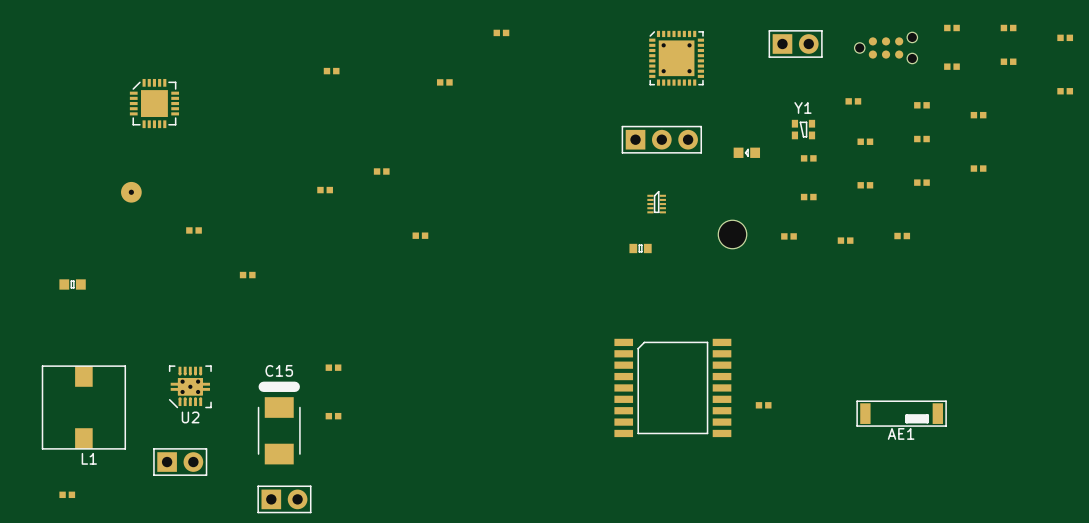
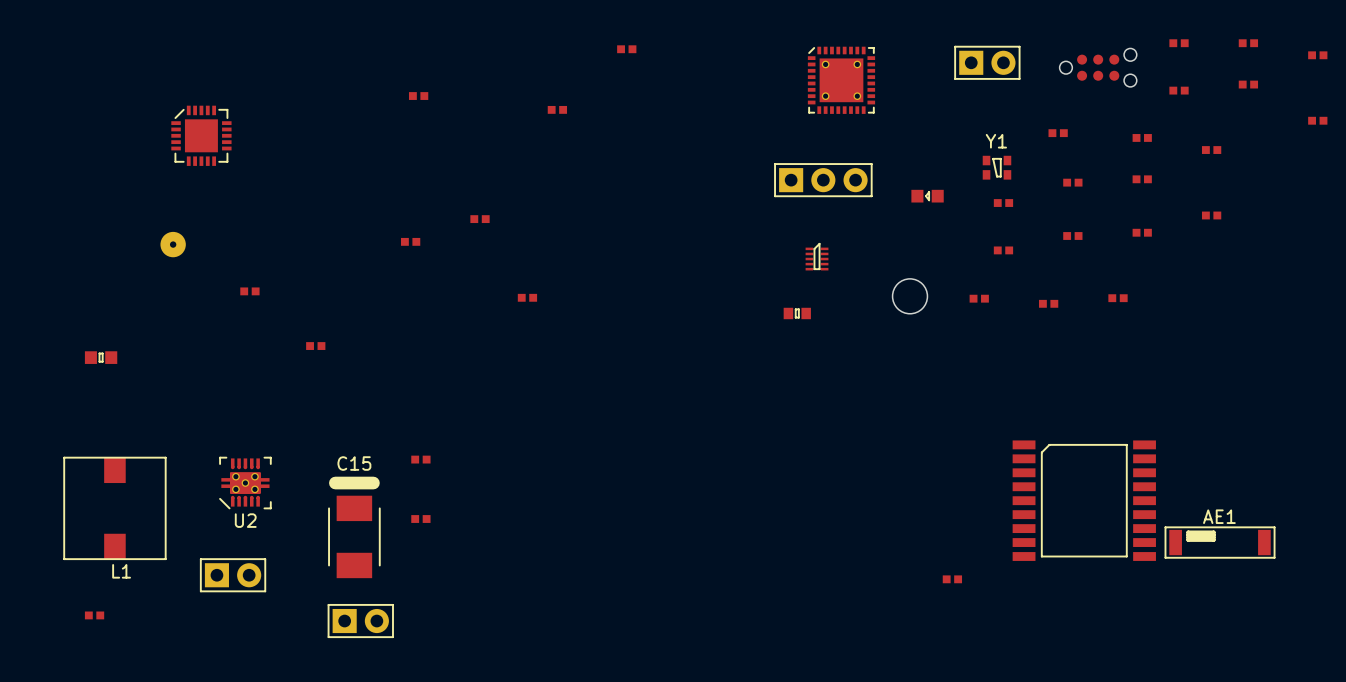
part position: (672, 387) -> (1084, 500)
part position: (763, 405) -> (952, 579)
AE1 rotation: 0° (901, 413) -> 180° (1220, 542)
AE1 position: (901, 413) -> (1220, 542)

